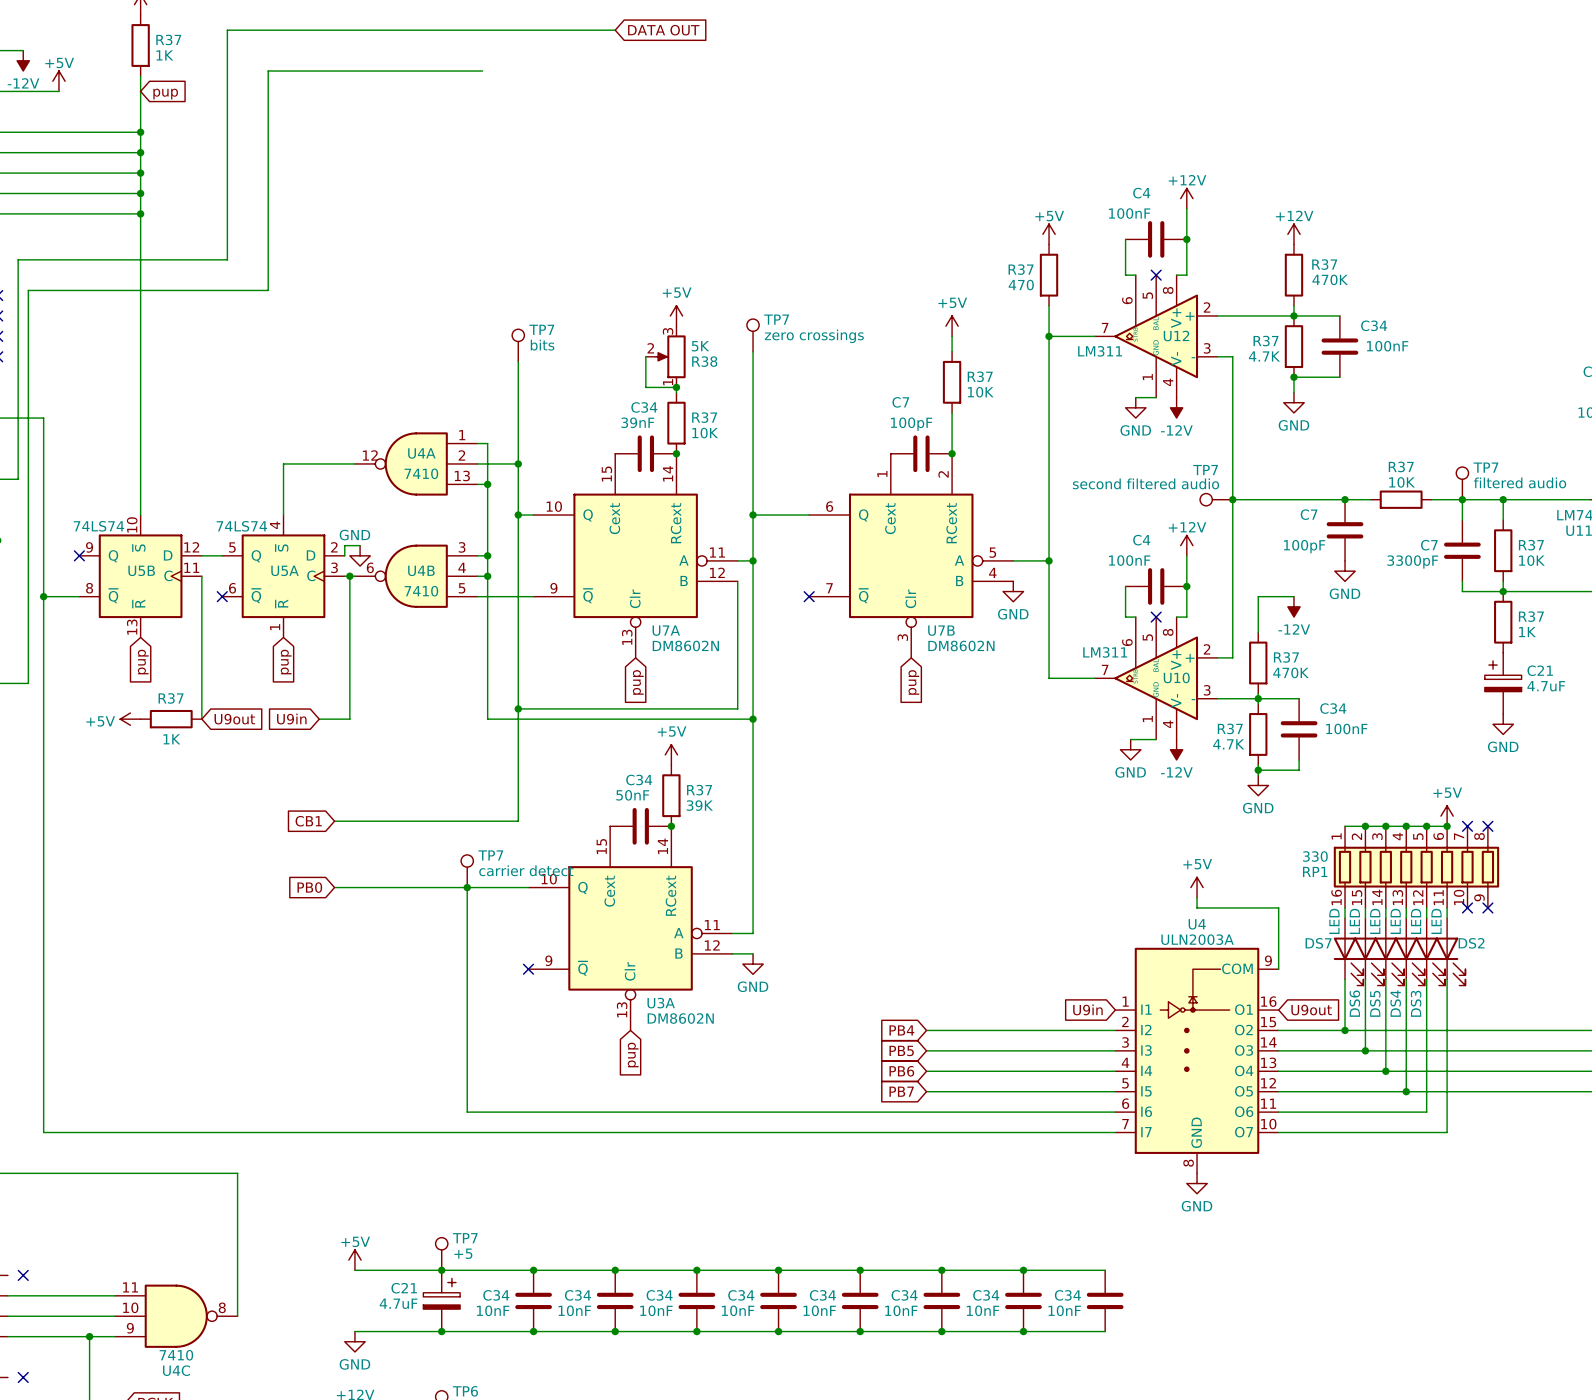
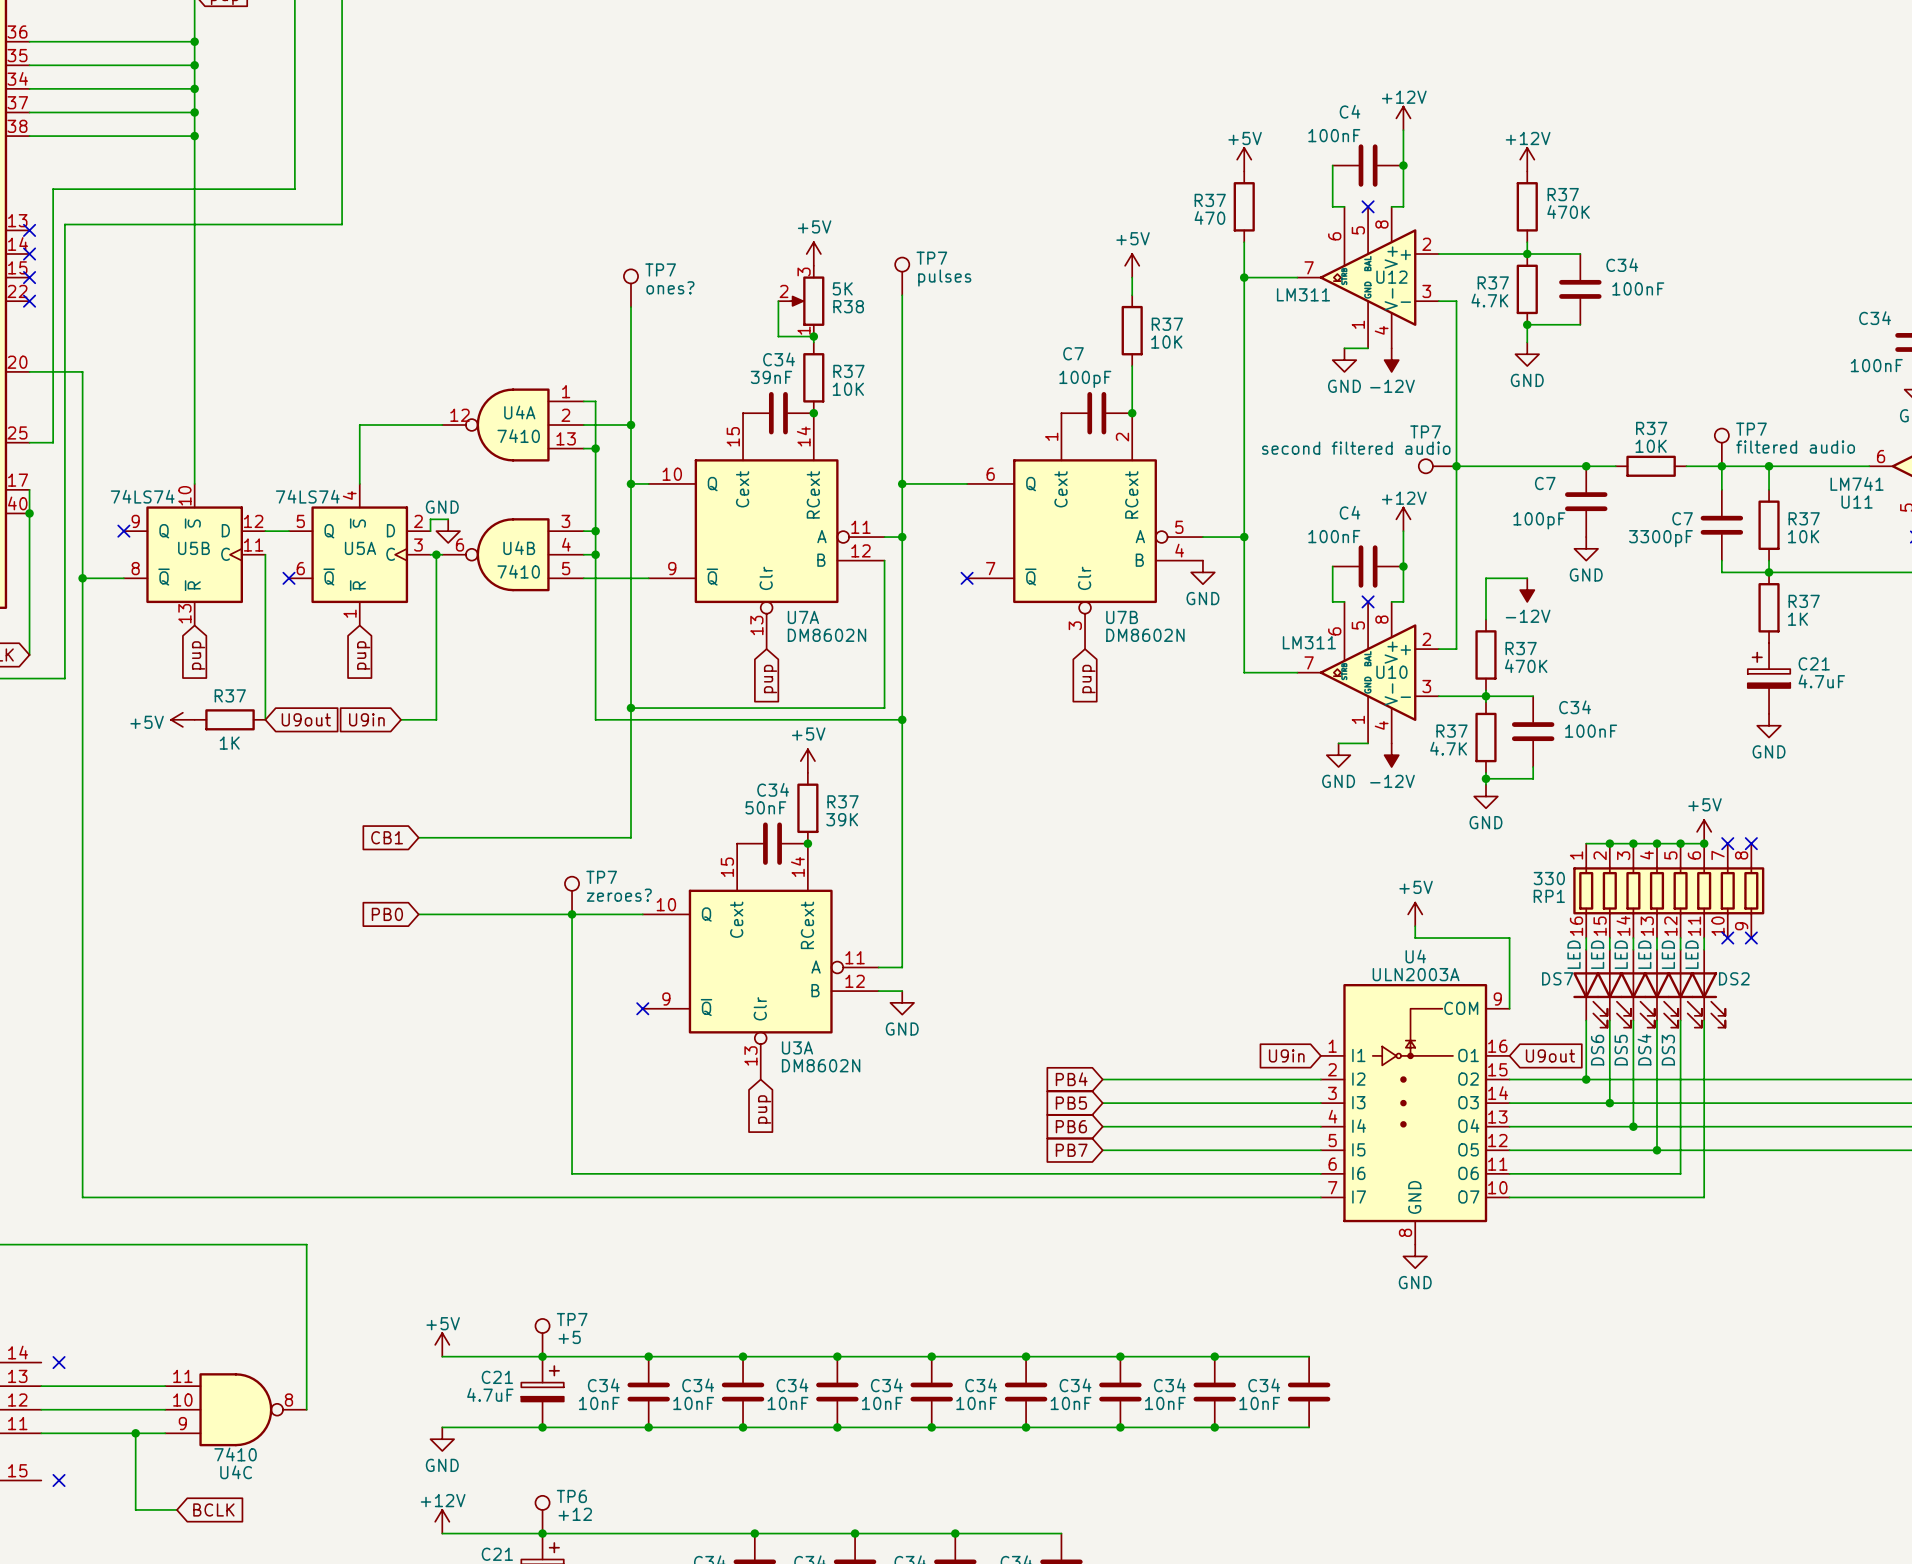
TP7 value: zero crossings (814, 336) -> pulses (944, 278)
TP7 value: bits (542, 345) -> ones? (670, 287)
TP7 value: carrier detect (526, 870) -> zeroes? (619, 895)

